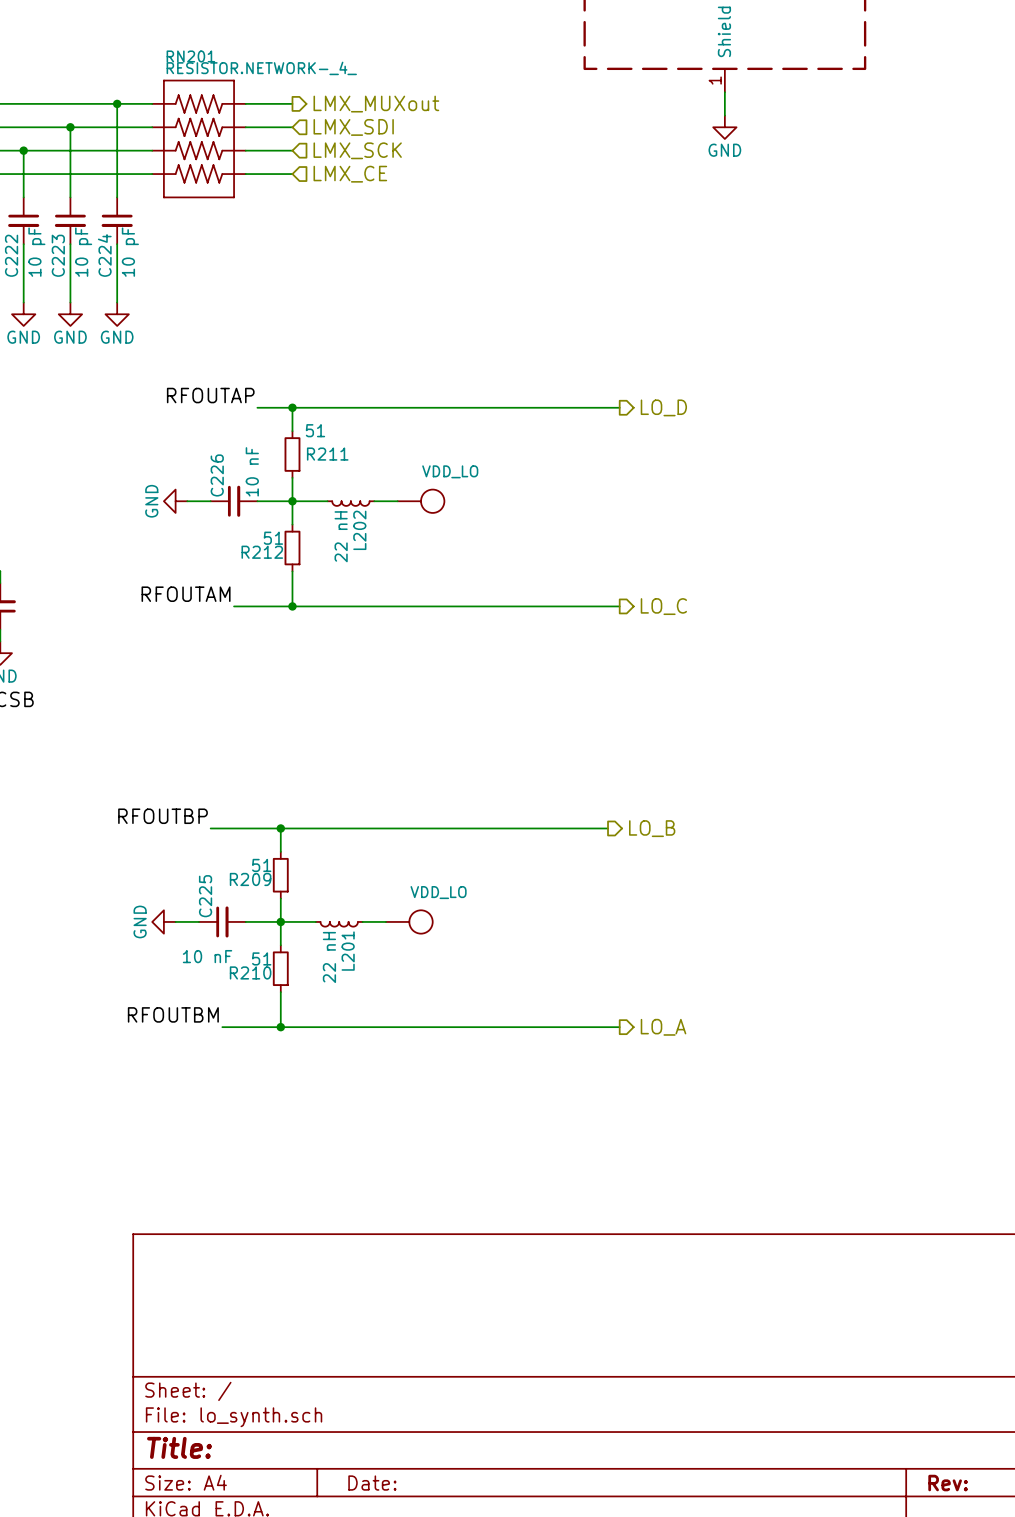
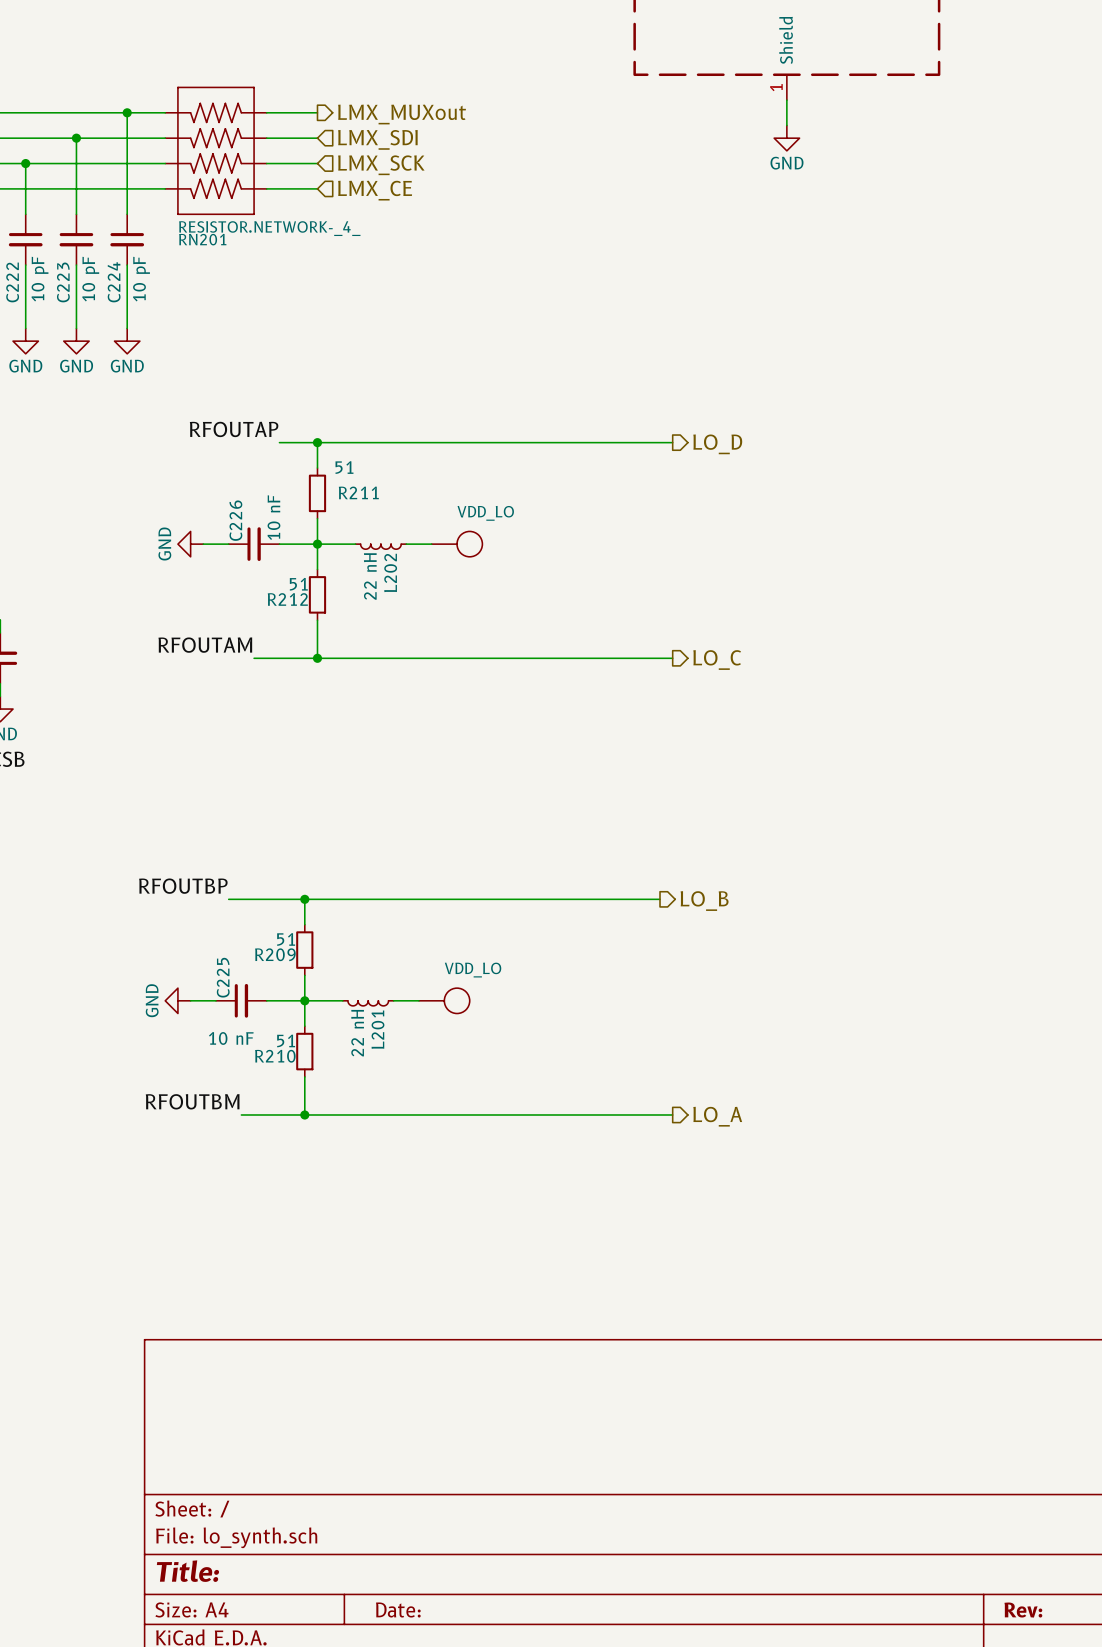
RN201 flip: as is (198, 138) -> up-down (216, 150)

